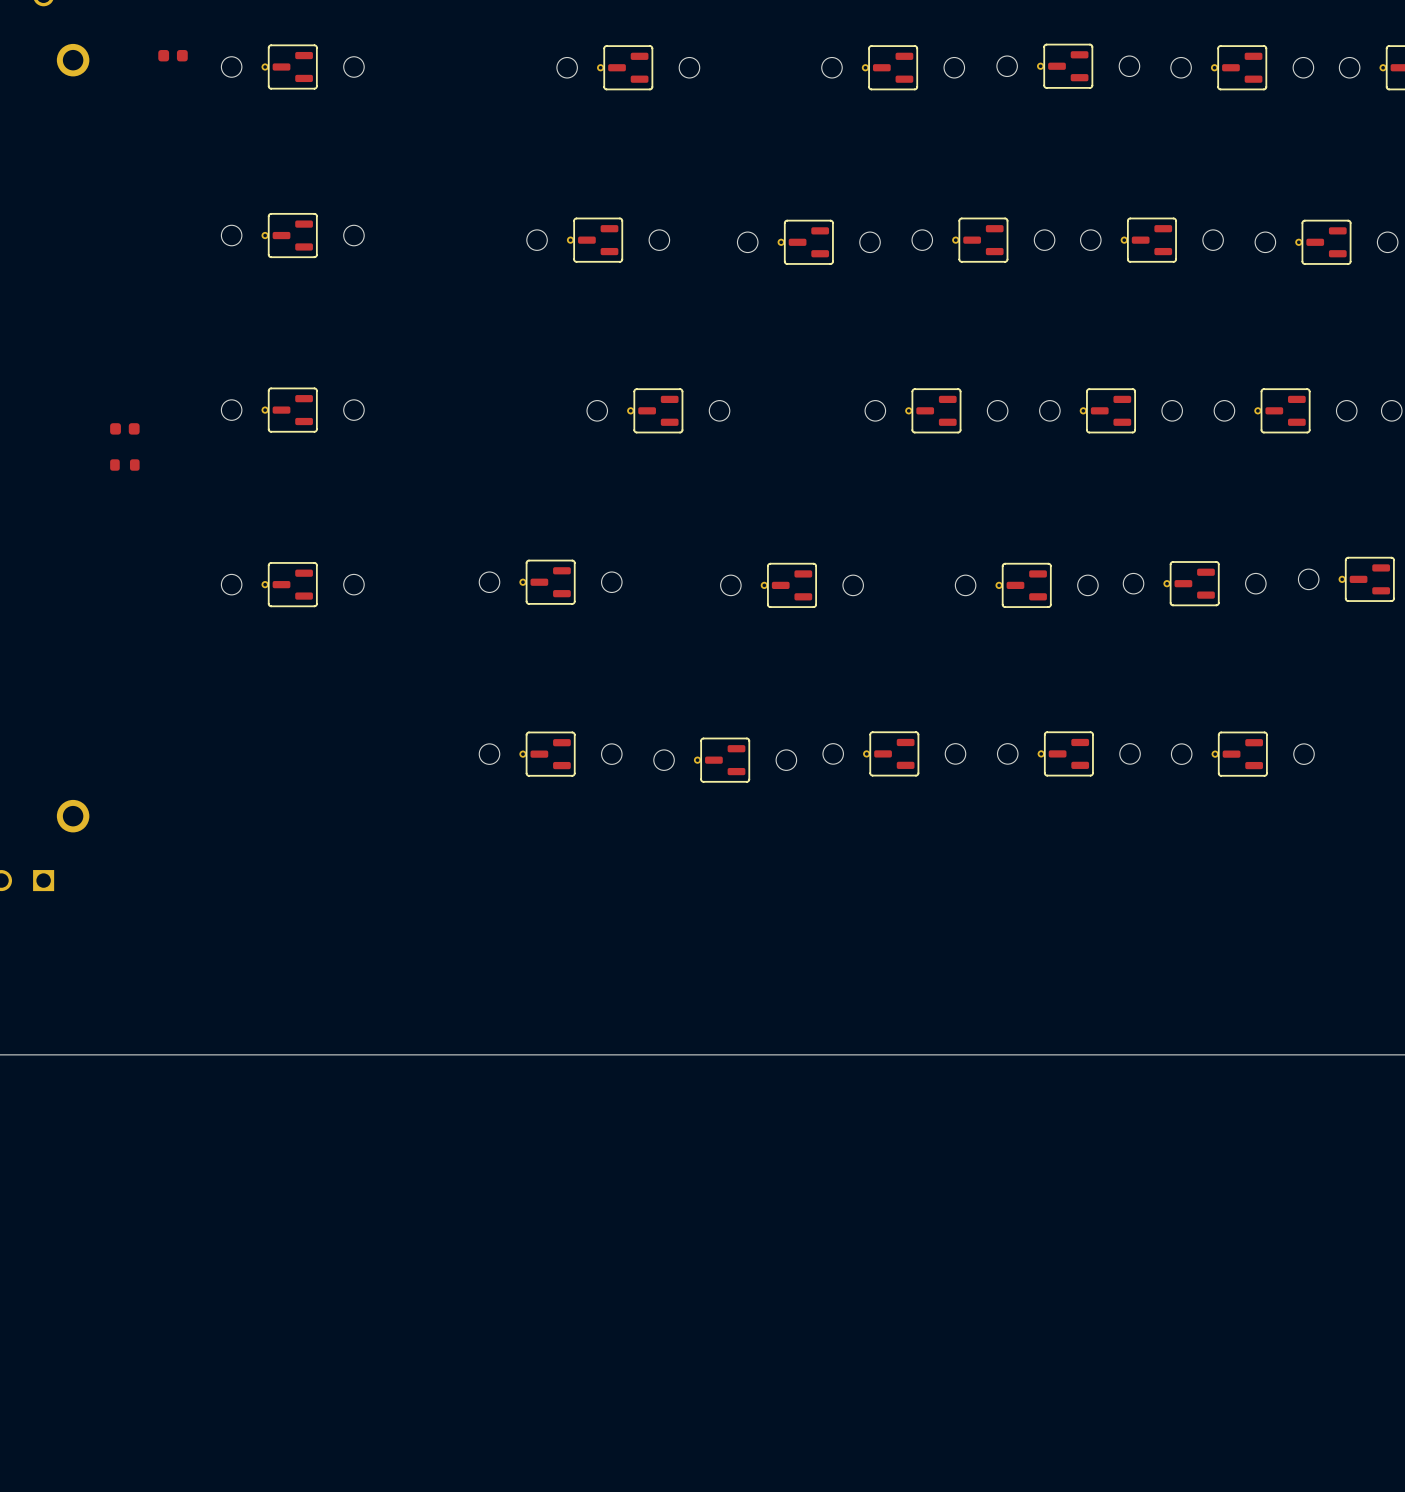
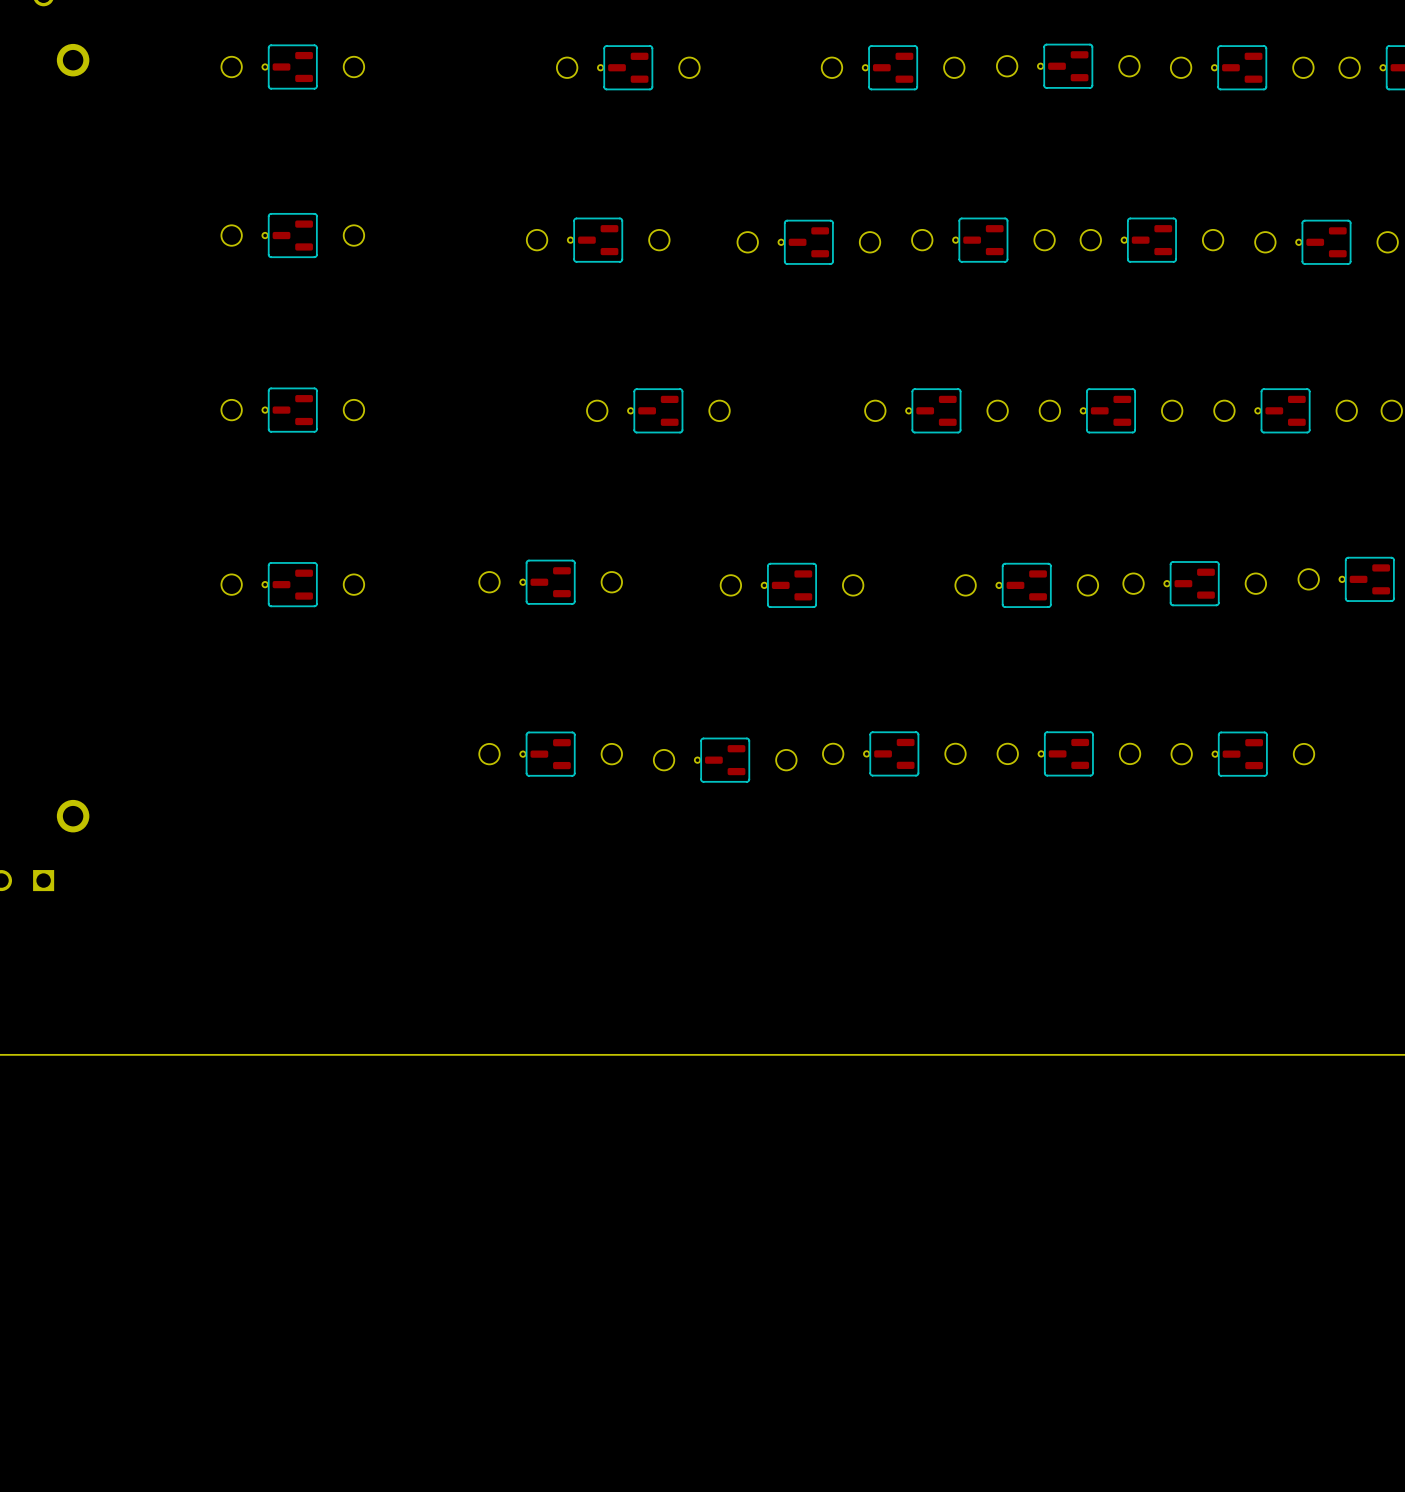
part: (173, 55) -> none
part: (124, 428) -> none
part: (124, 465) -> none

